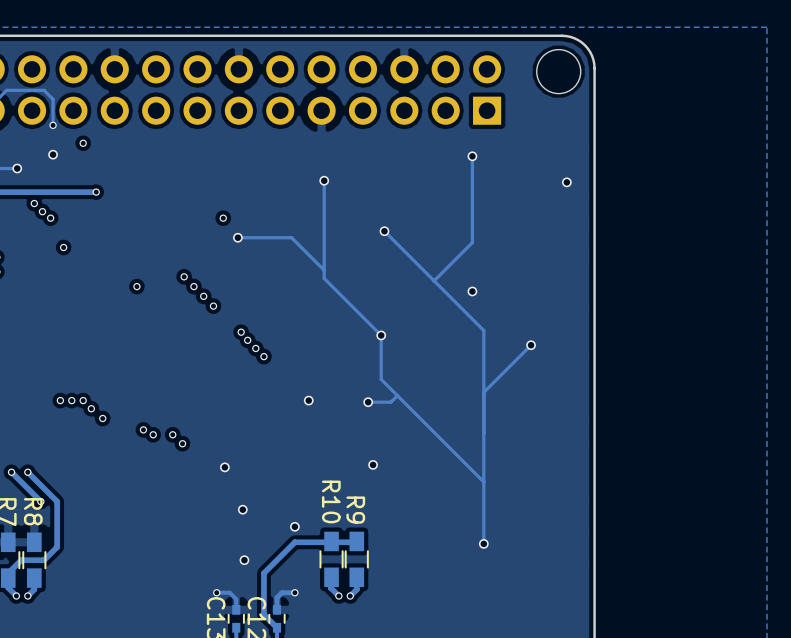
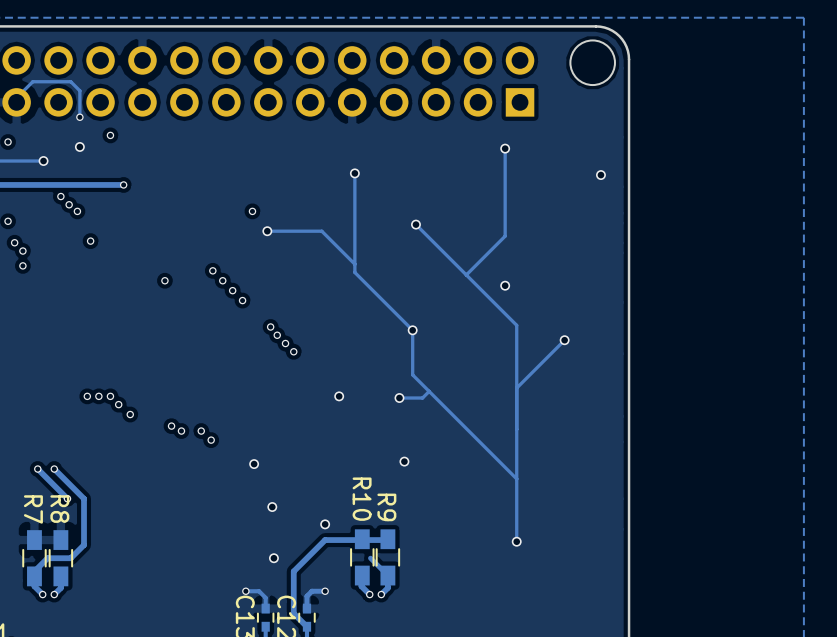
track: none -> (370, 558) (387, 575)

